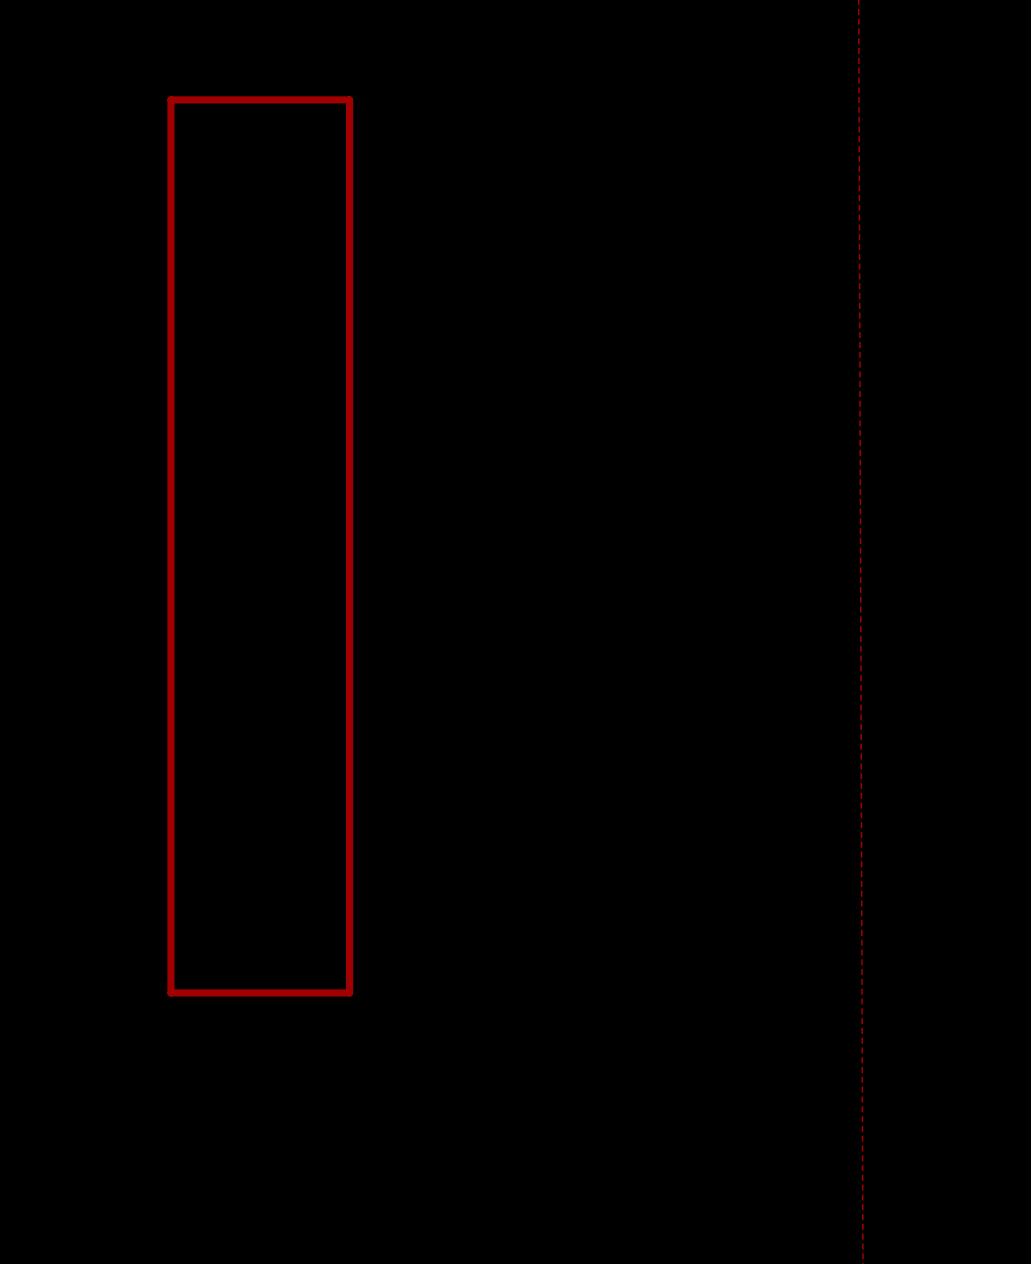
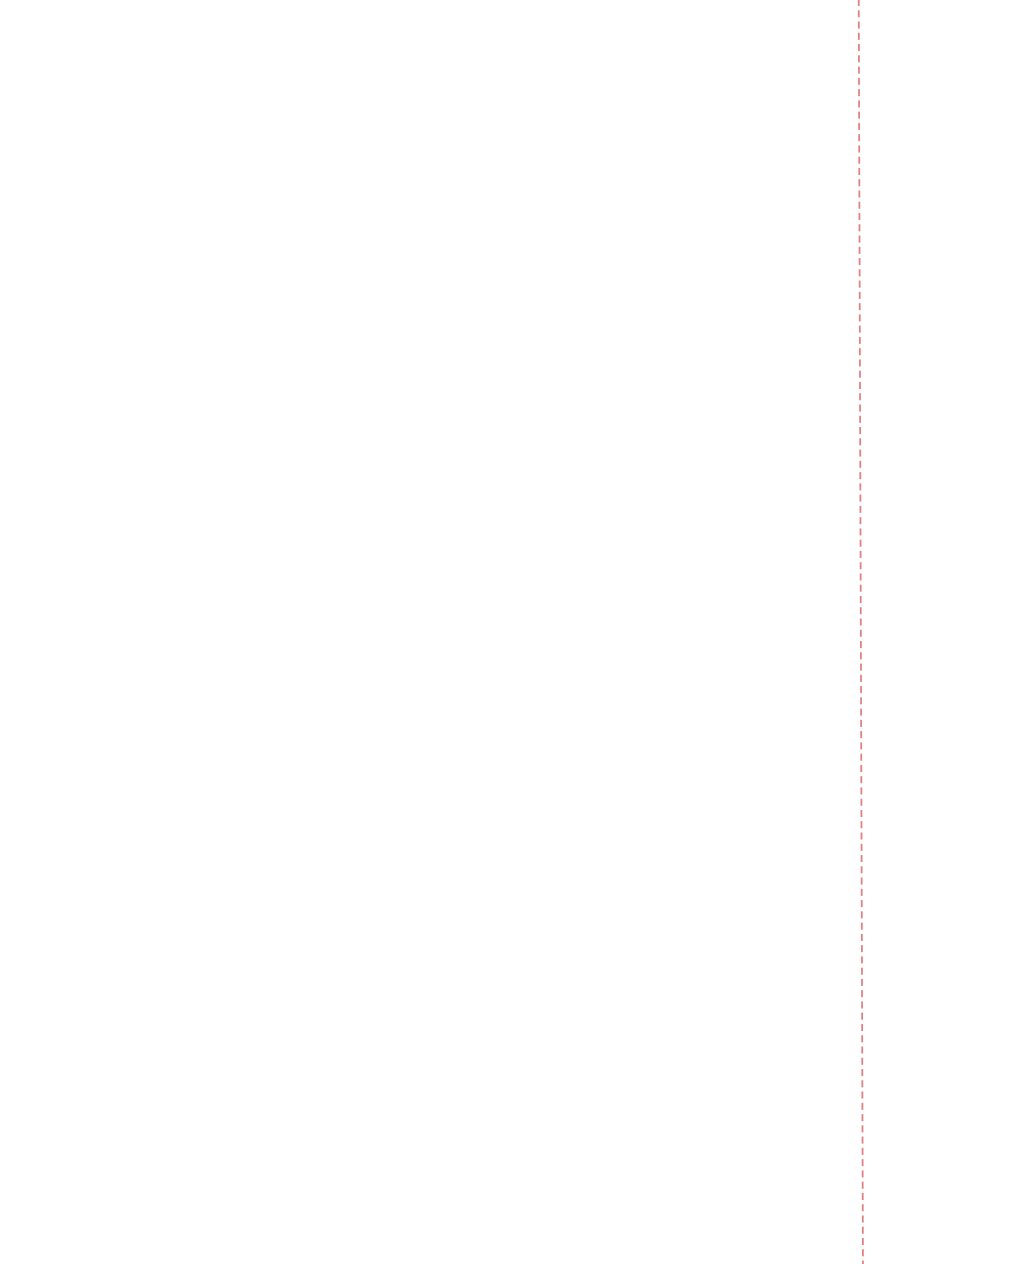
top track: (170, 99) (349, 99) (349, 992) (170, 992) (170, 99) -> none

